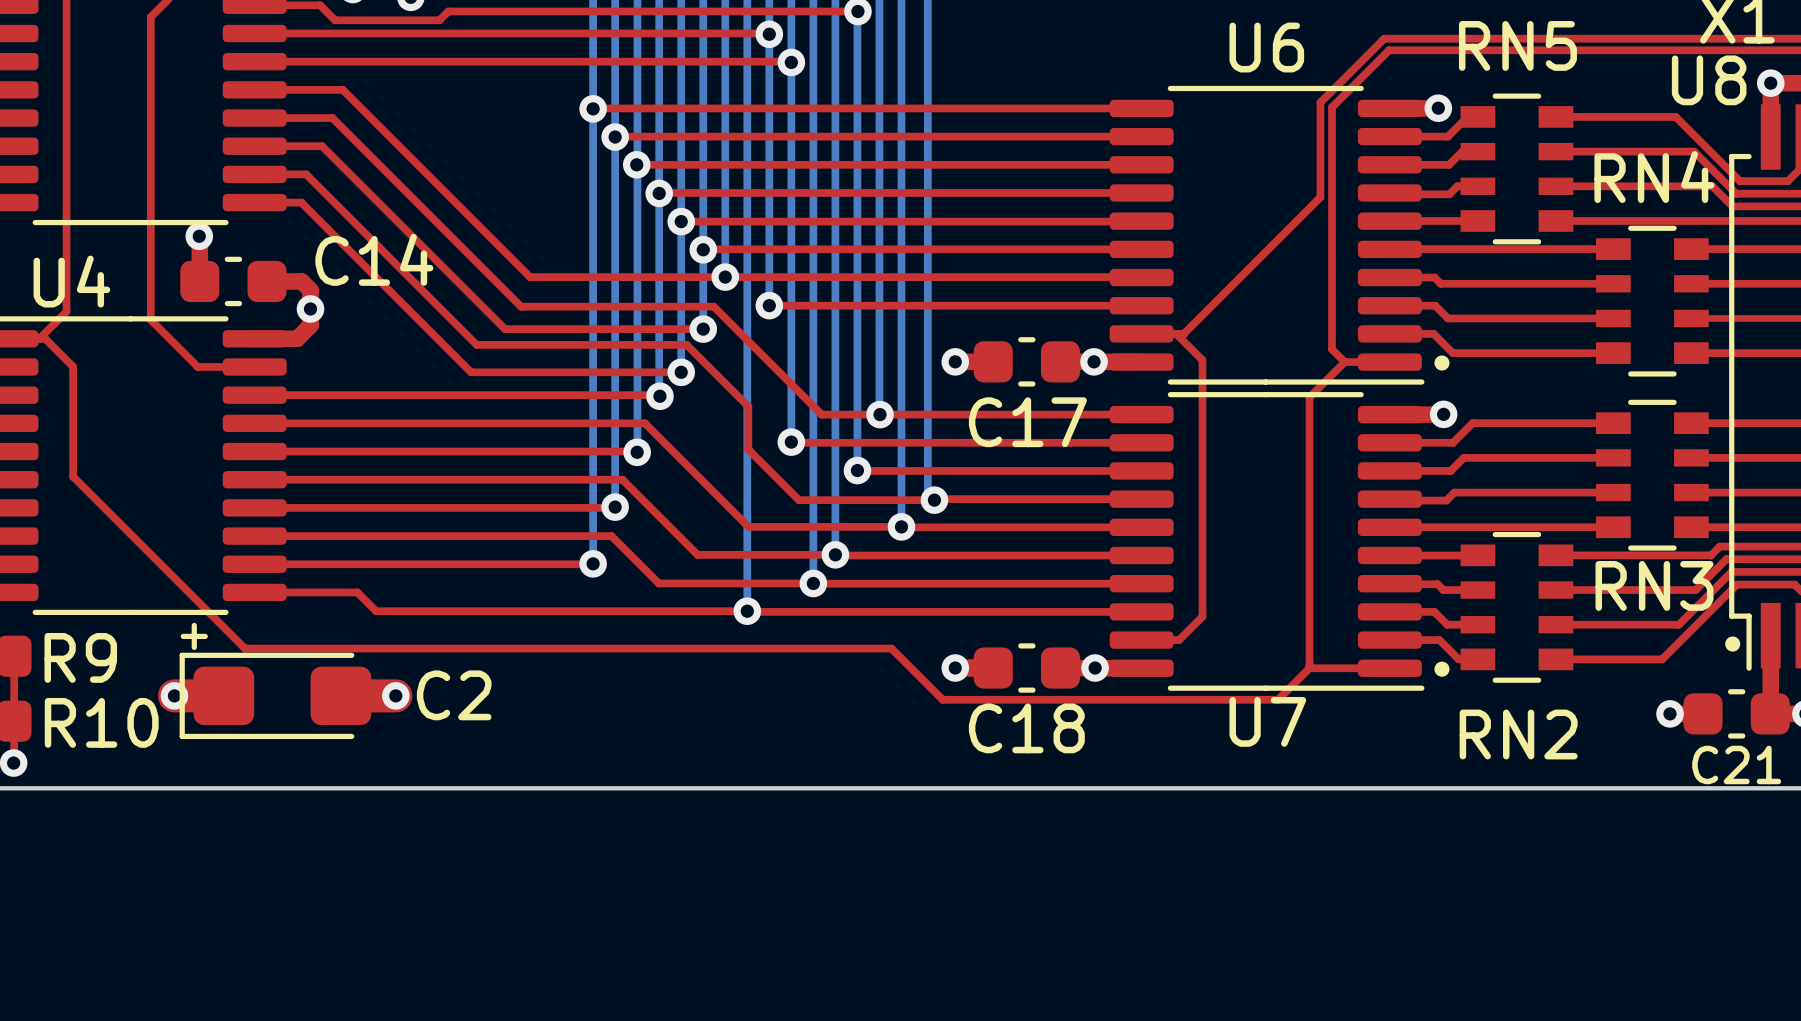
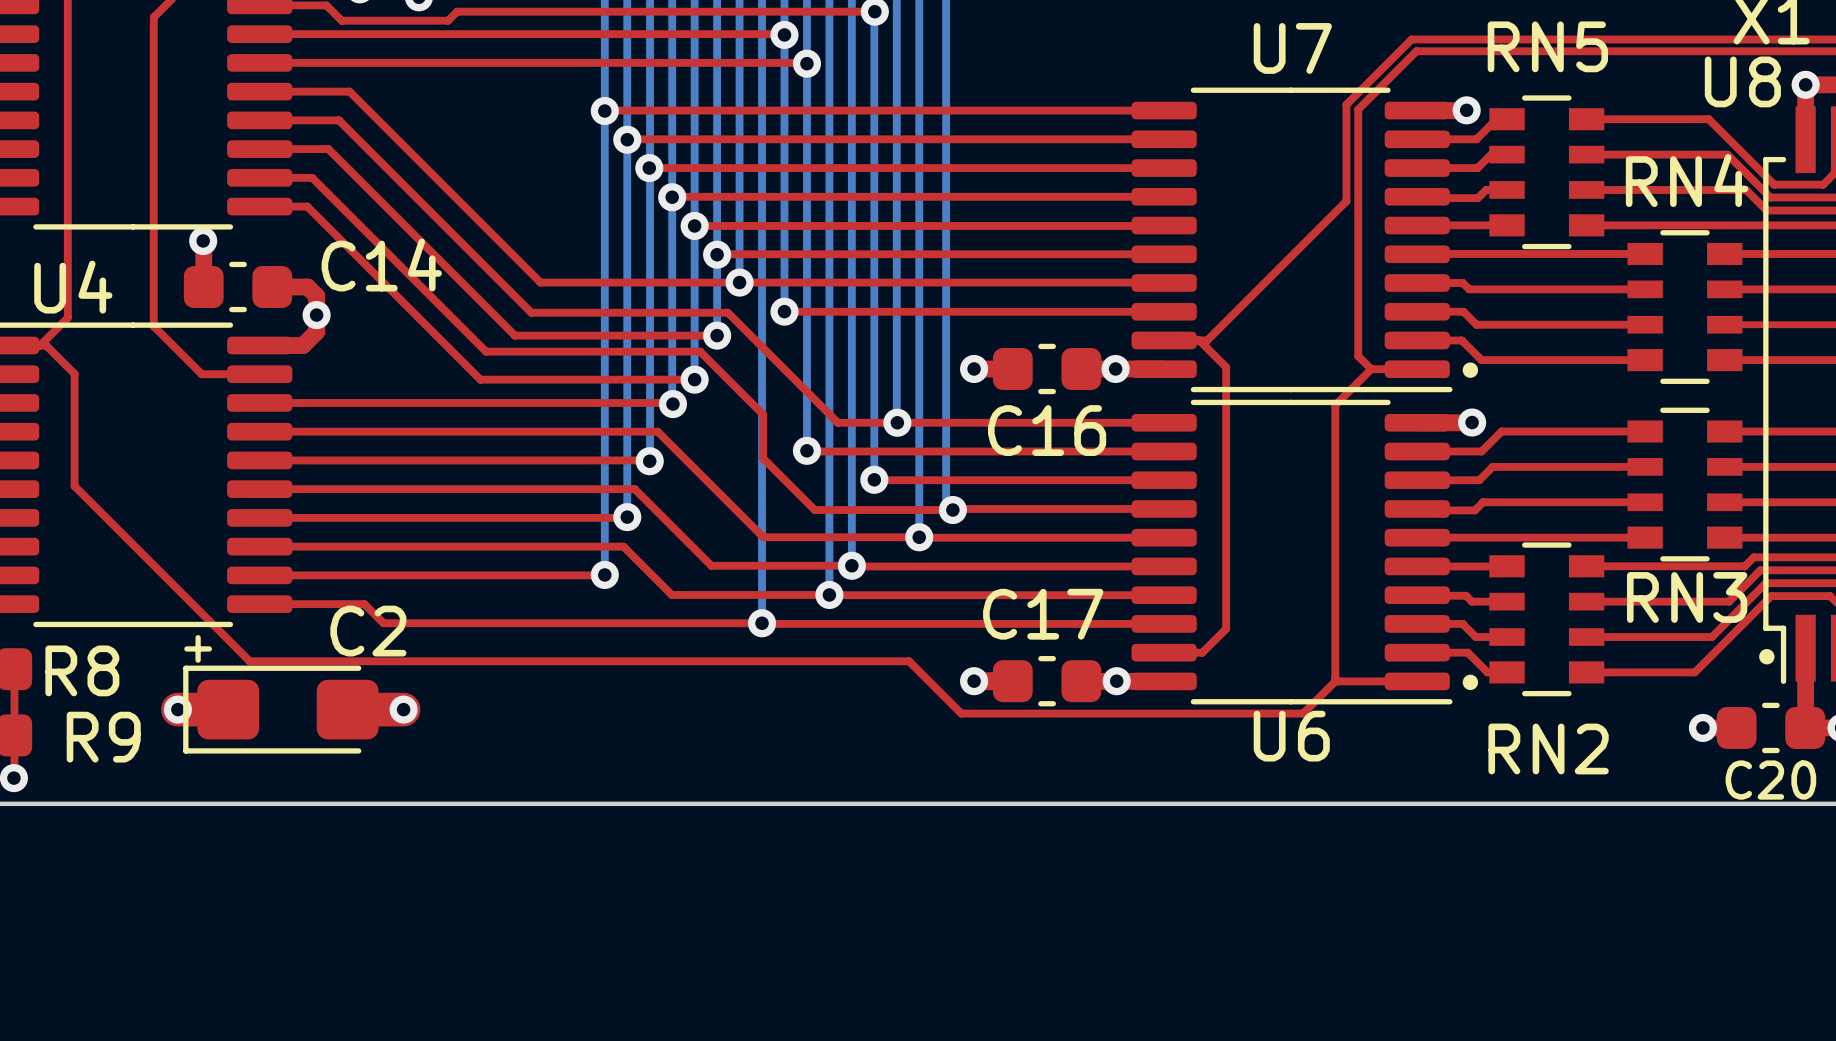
U6 name: U6 (1266, 47) -> U7 (1292, 48)
C17 name: C17 (1027, 422) -> C16 (1047, 430)
R9 name: R9 (80, 657) -> R8 (82, 670)
C2 name position: C2 (454, 695) -> C2 (368, 631)
U7 name: U7 (1267, 721) -> U6 (1291, 736)
R10 name: R10 (101, 722) -> R9 (103, 737)
C18 name: C18 (1026, 728) -> C17 (1043, 614)
C21 name: C21 (1736, 764) -> C20 (1770, 780)

